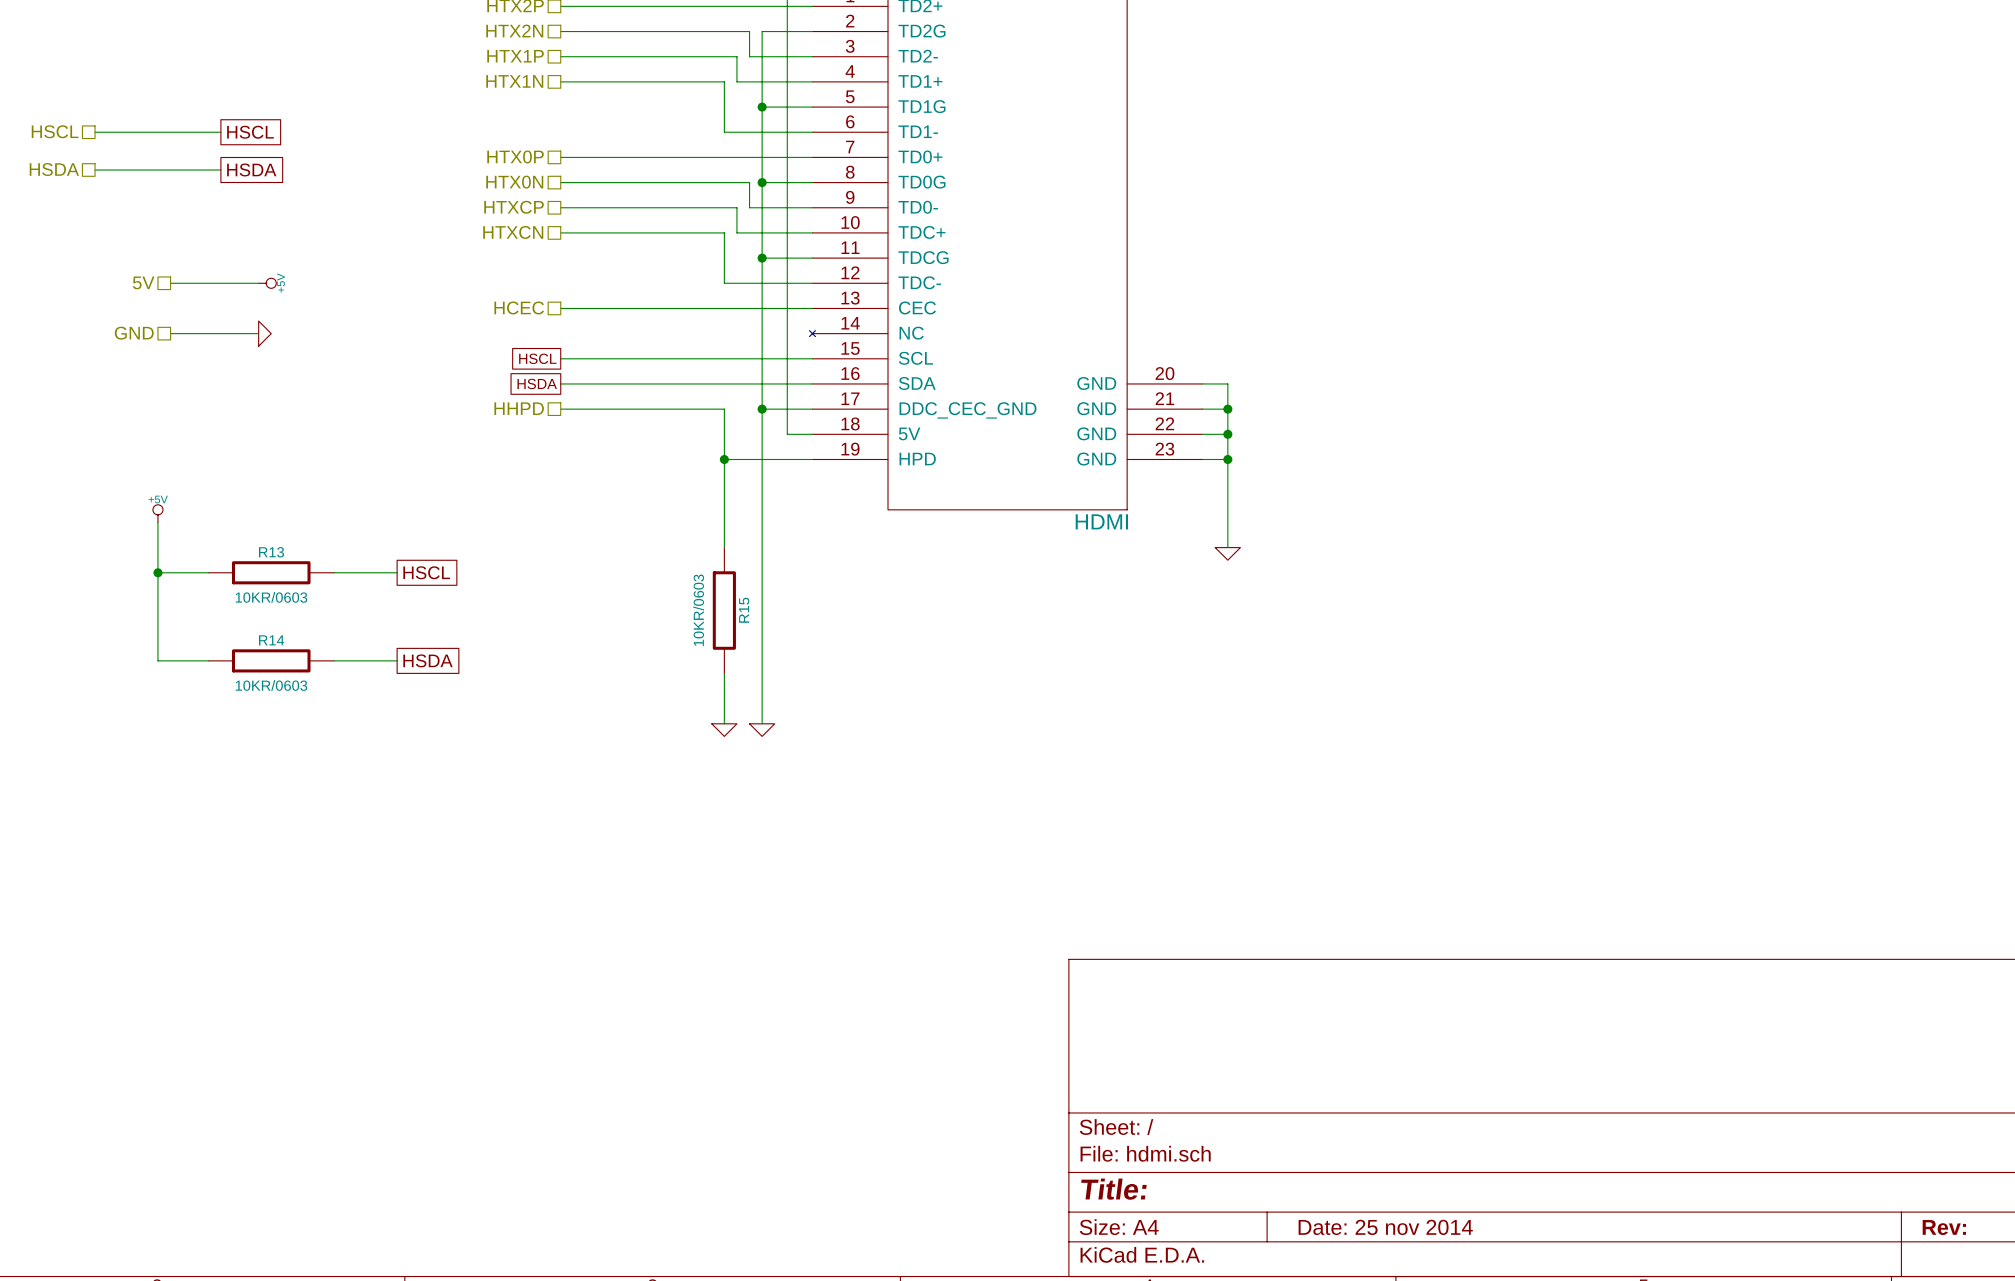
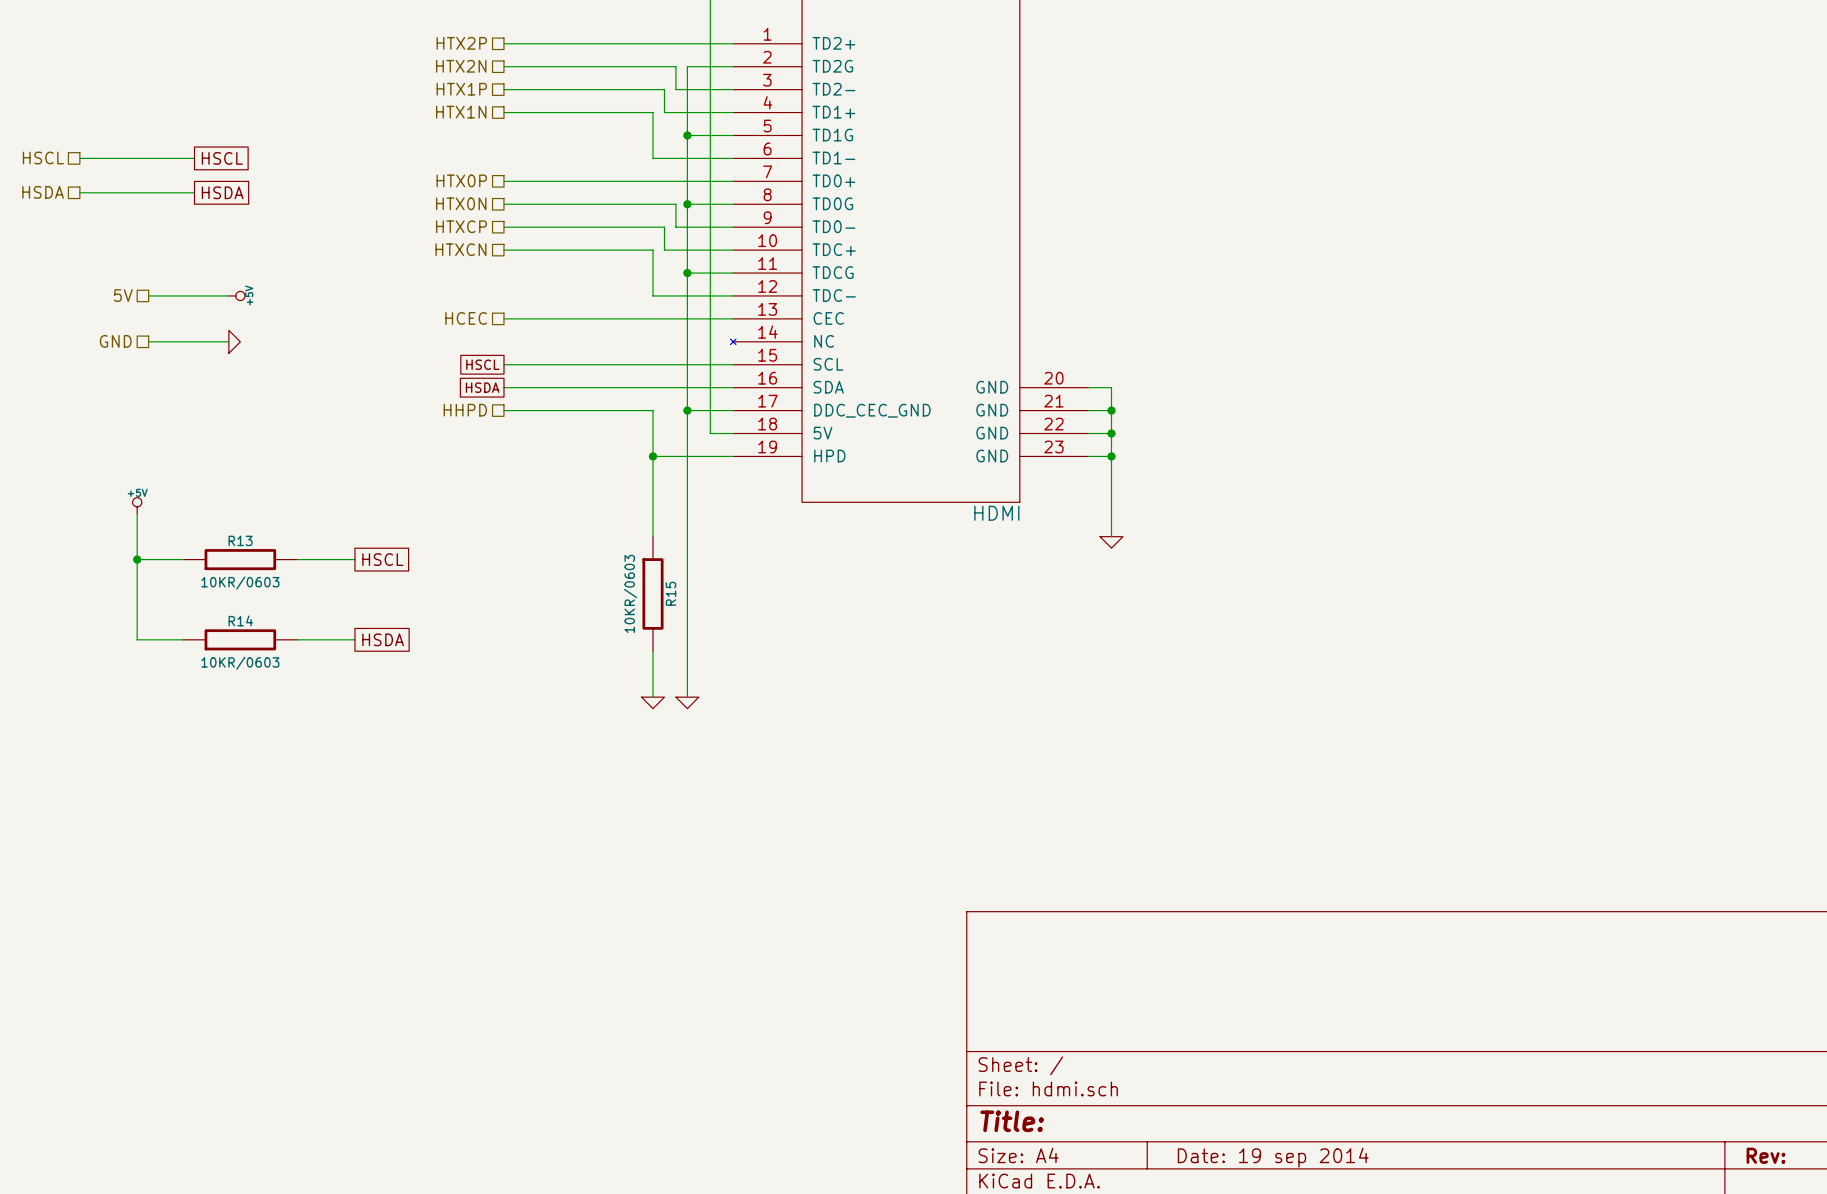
title block: Date: 25 nov 2014 (1385, 1227) -> Date: 19 sep 2014 (1273, 1157)

